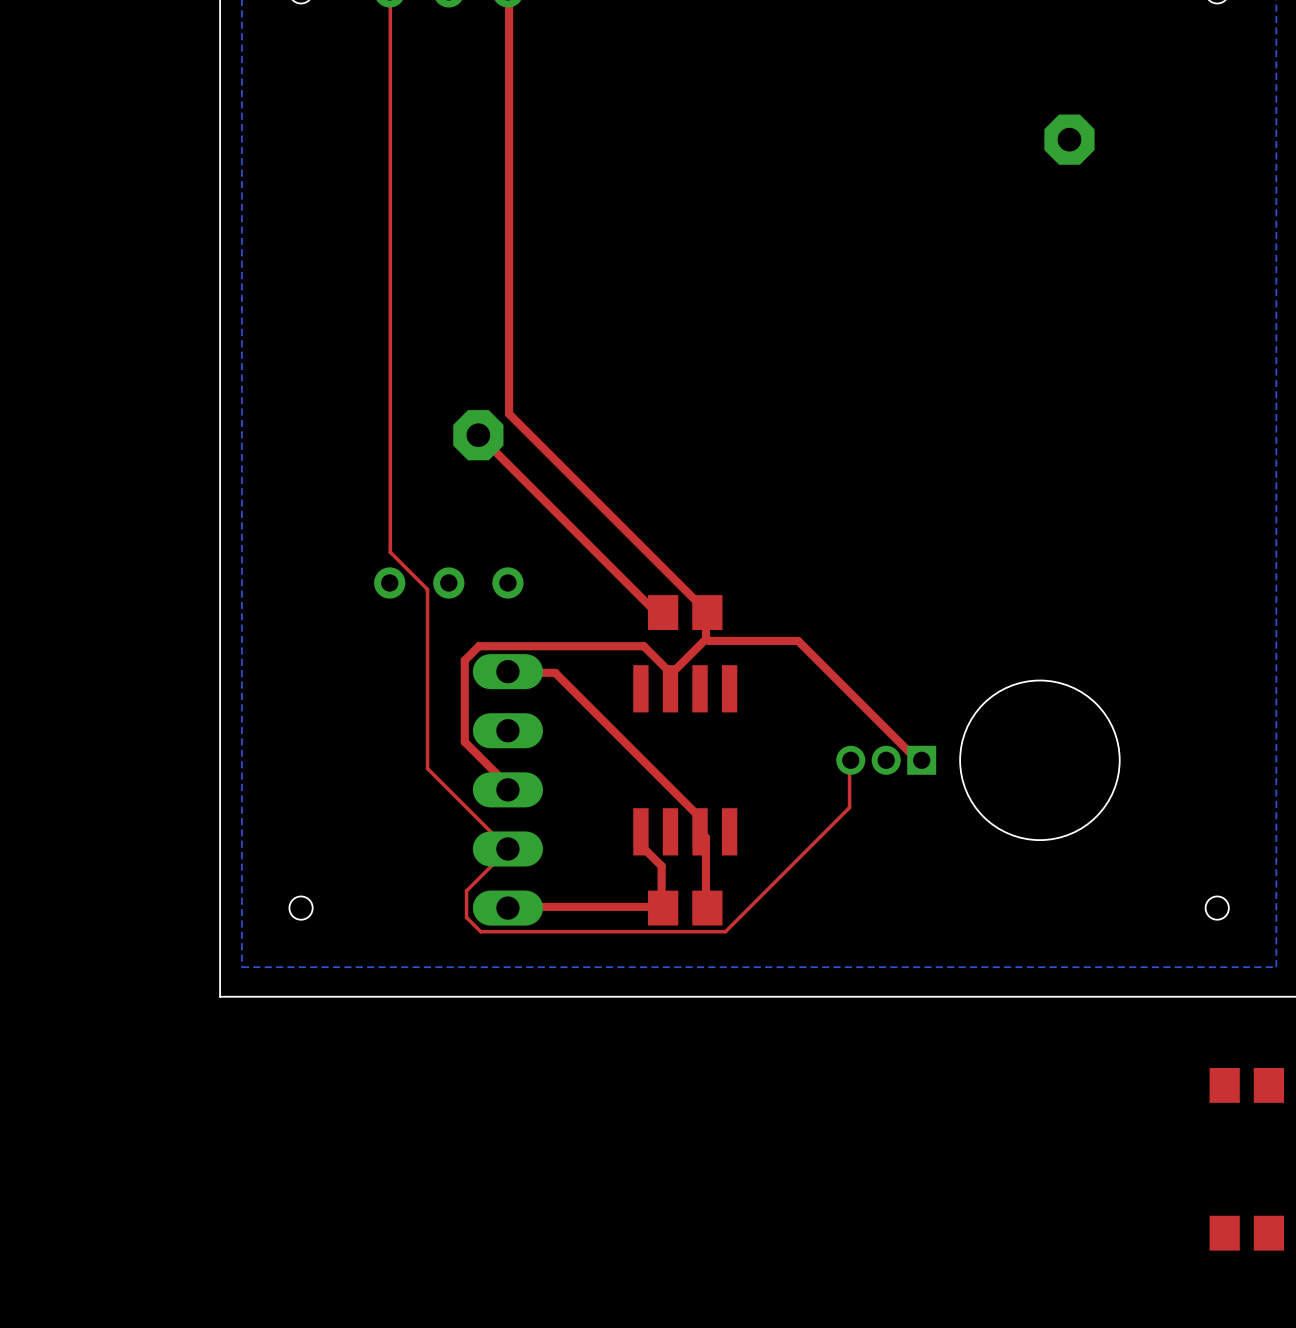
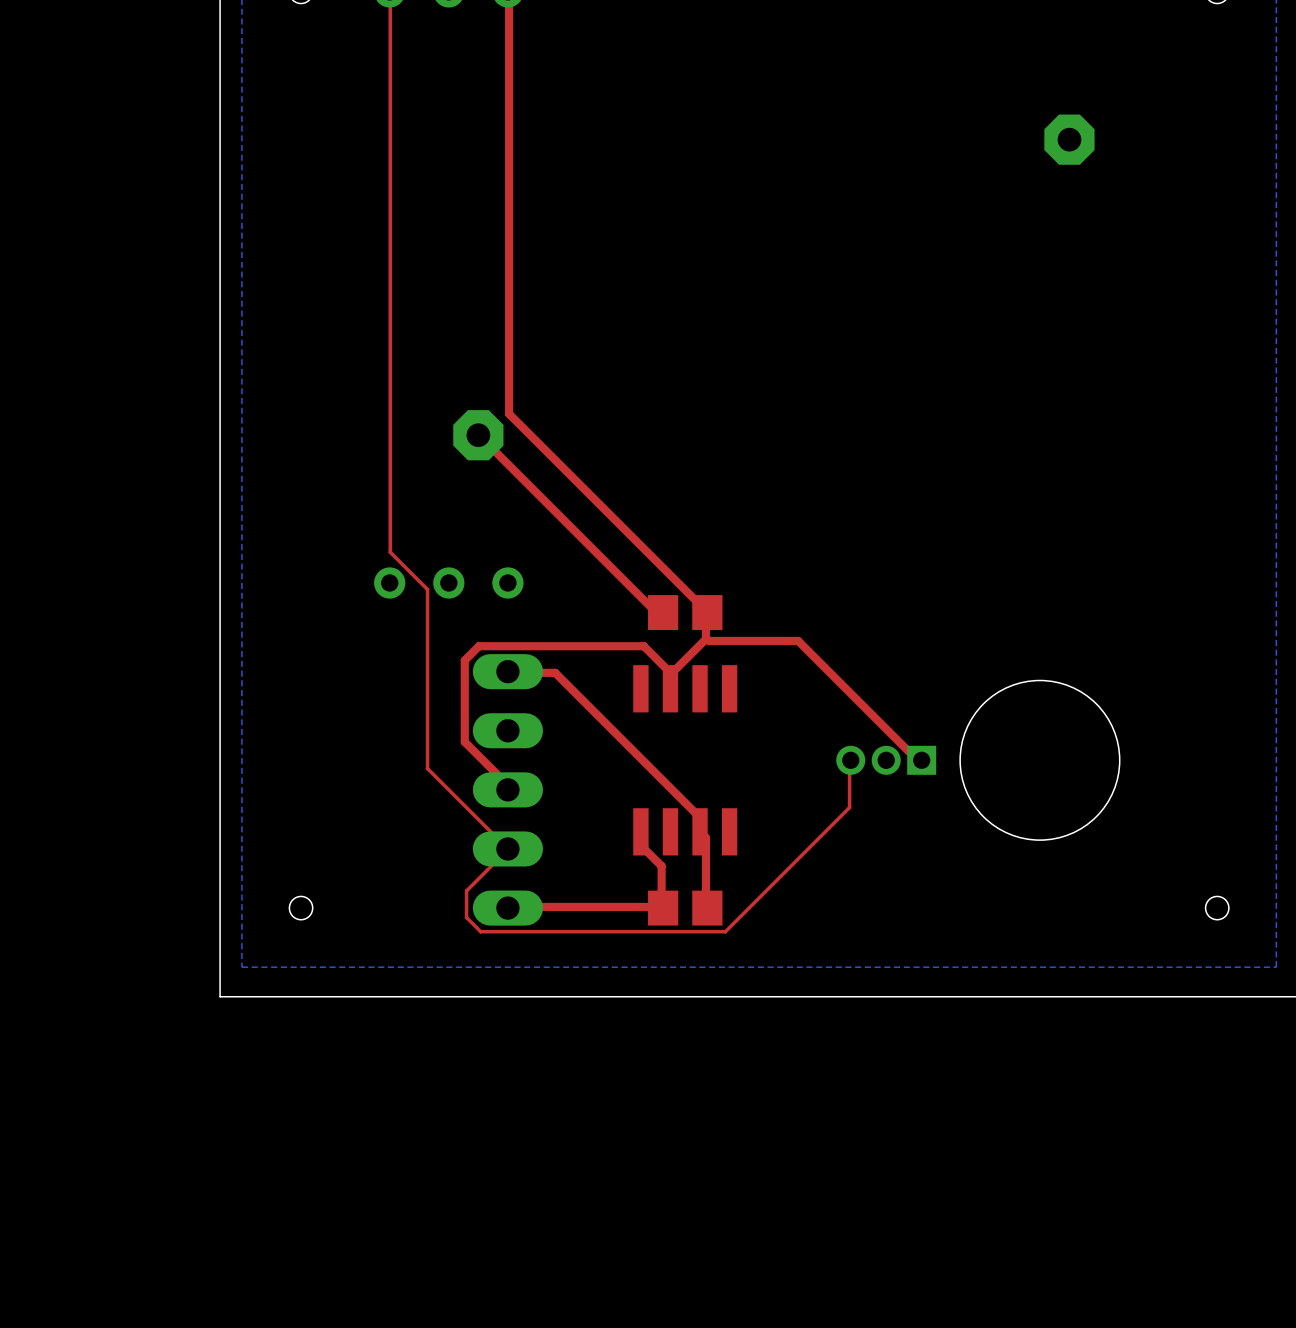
part: (1246, 1085) -> none
part: (1246, 1233) -> none

